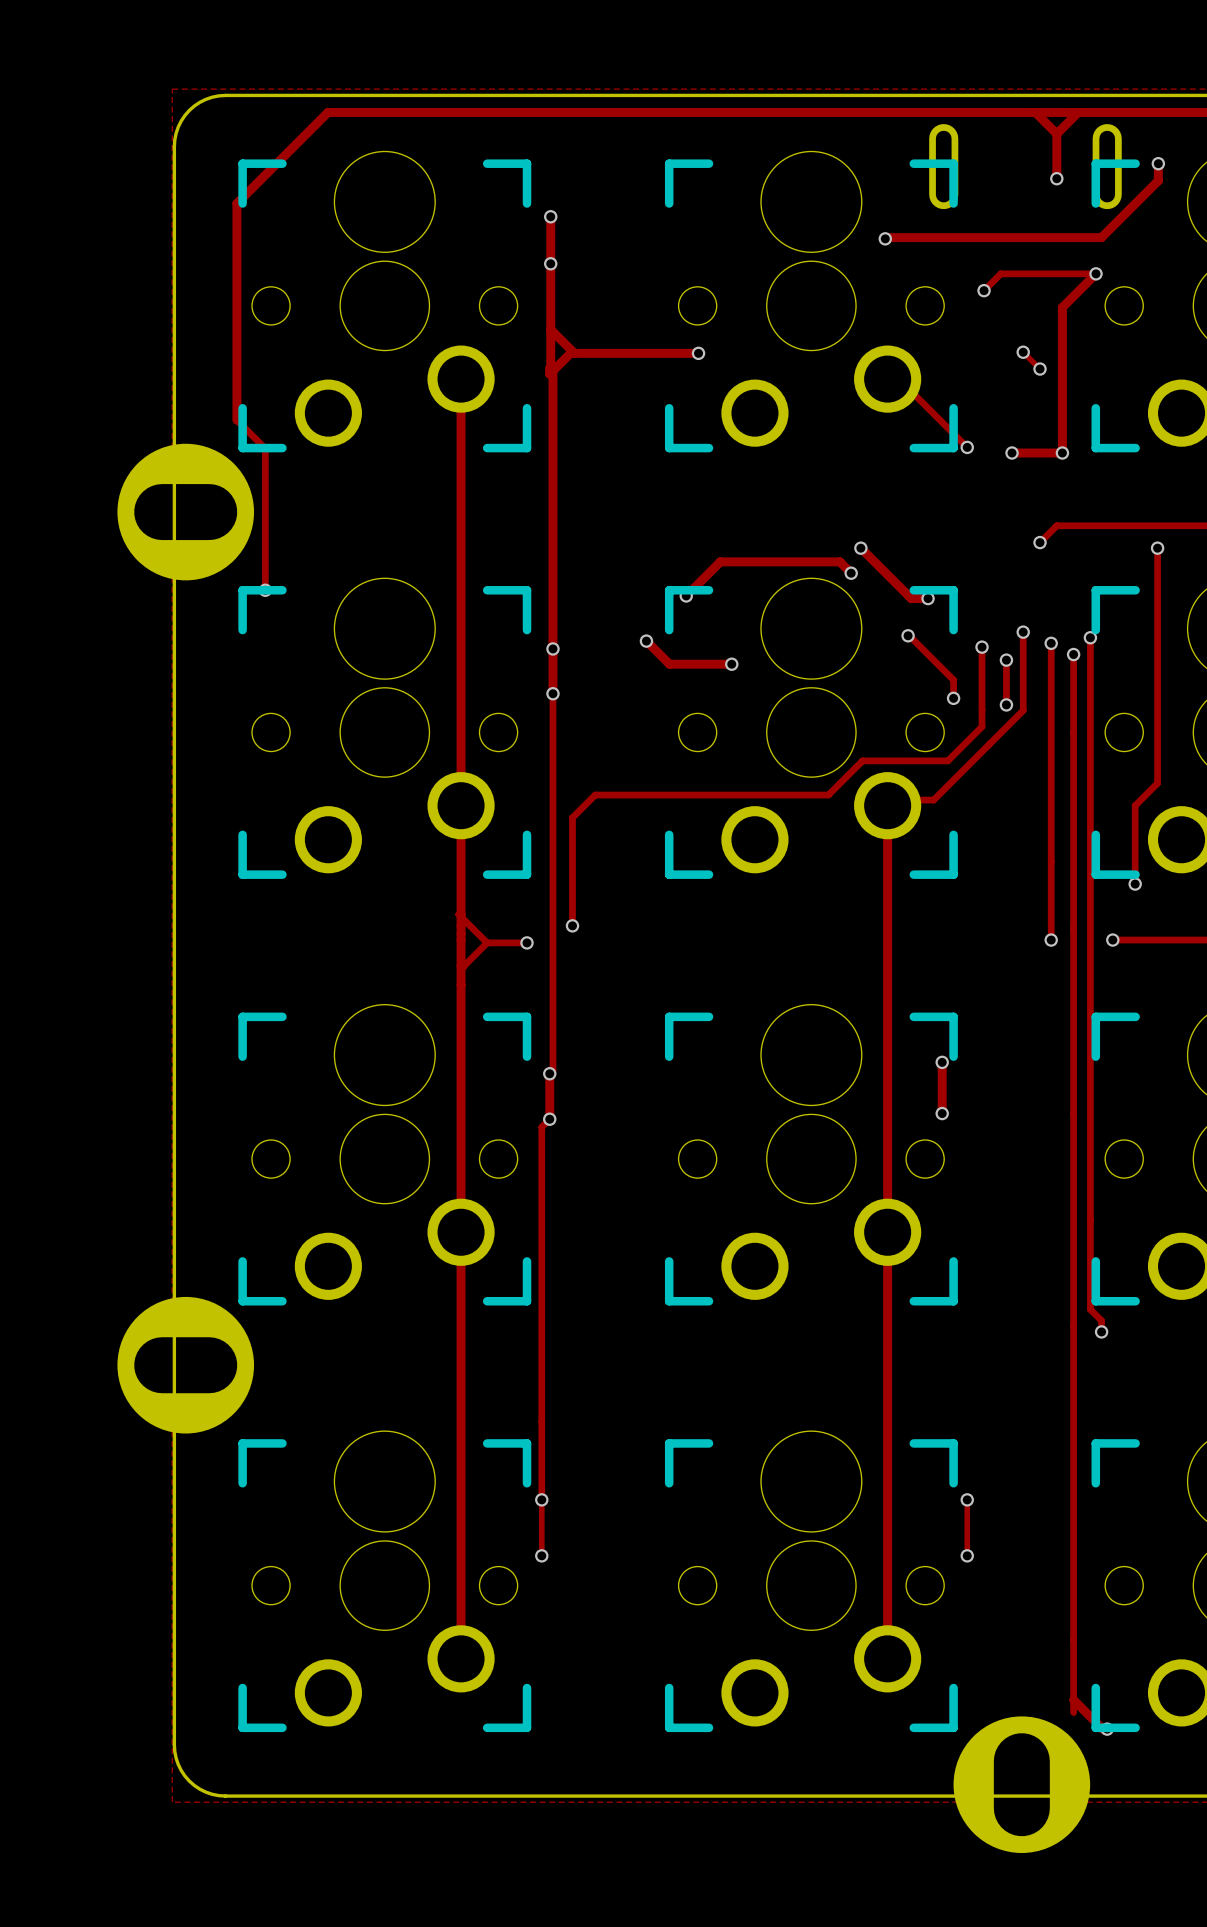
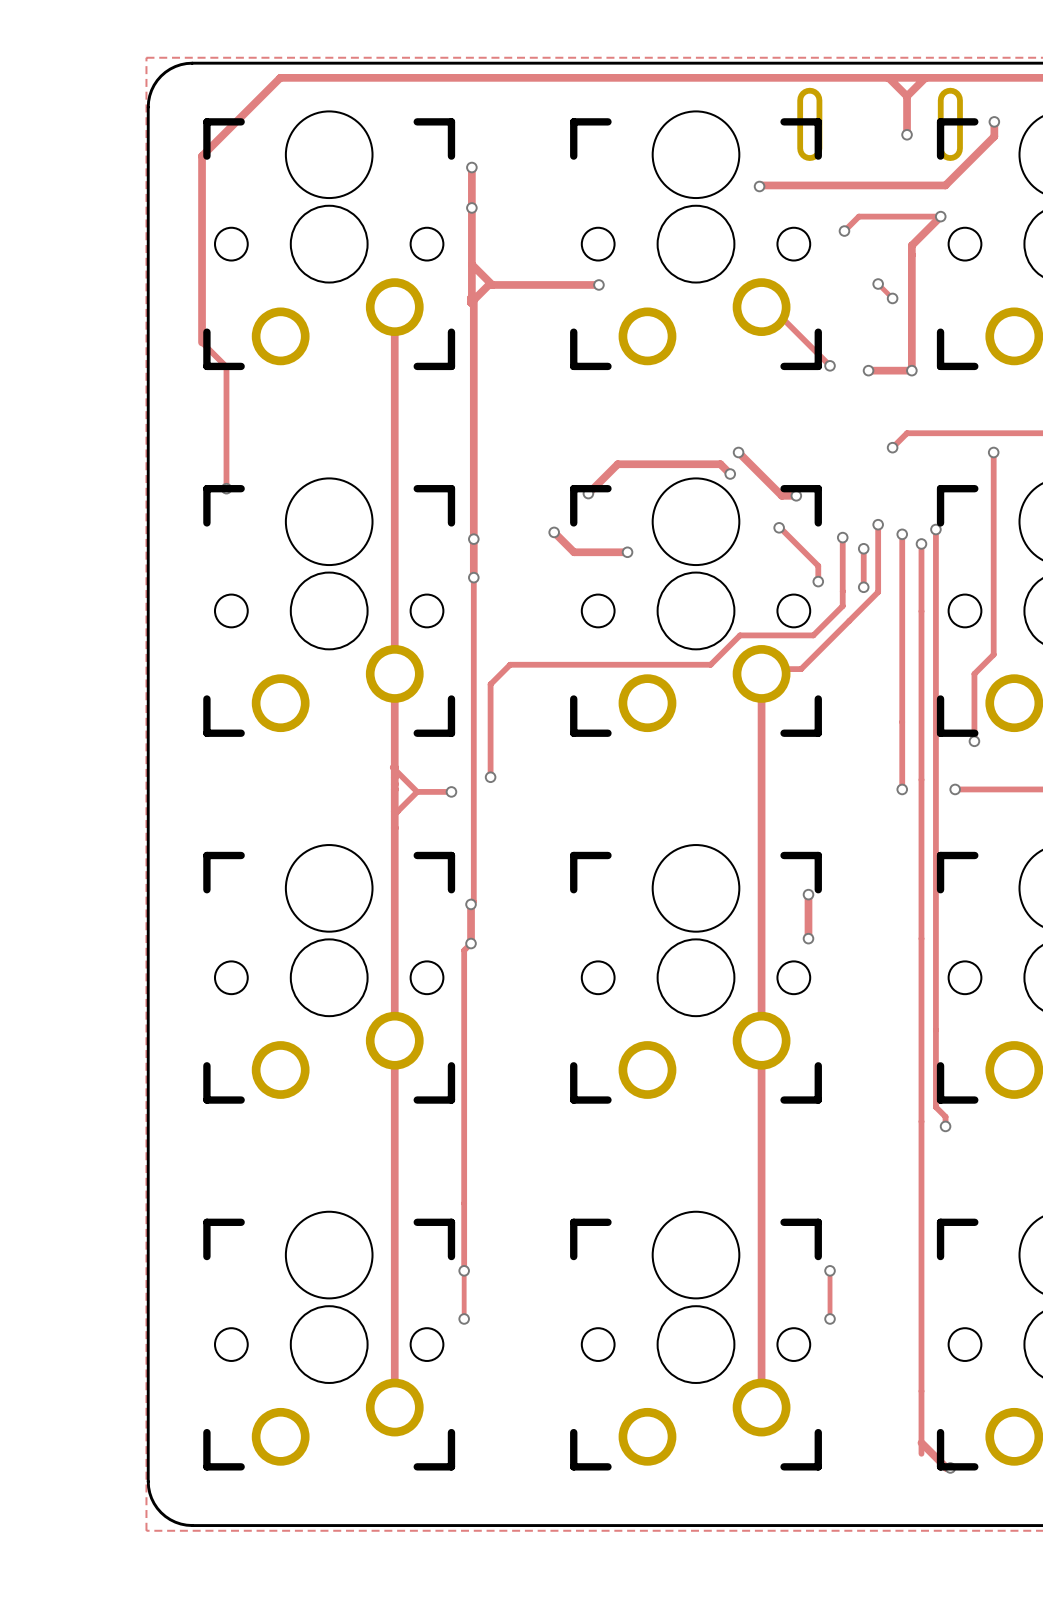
part: (185, 512) -> none
part: (185, 1365) -> none
part: (1021, 1784) -> none

